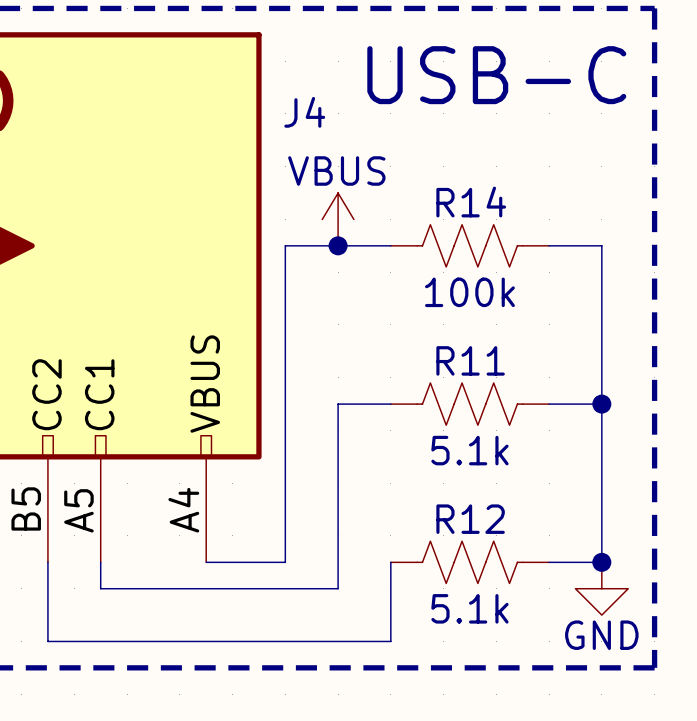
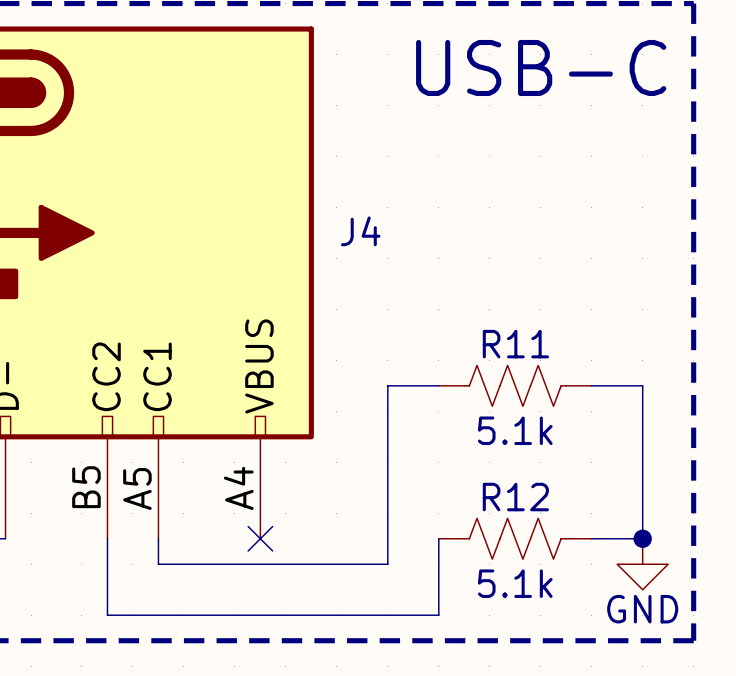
J4 name position: J4 (304, 112) -> J4 (360, 231)
power symbol: VBUS (338, 219) -> none
junction: (338, 245) -> none
wire: (390, 245) (285, 245) (285, 562) (206, 562) -> none
R14: 100k (469, 245) -> none
wire: (549, 245) (601, 245) (601, 404) -> none
junction: (601, 404) -> none
no-connect mark: none -> (260, 538)

